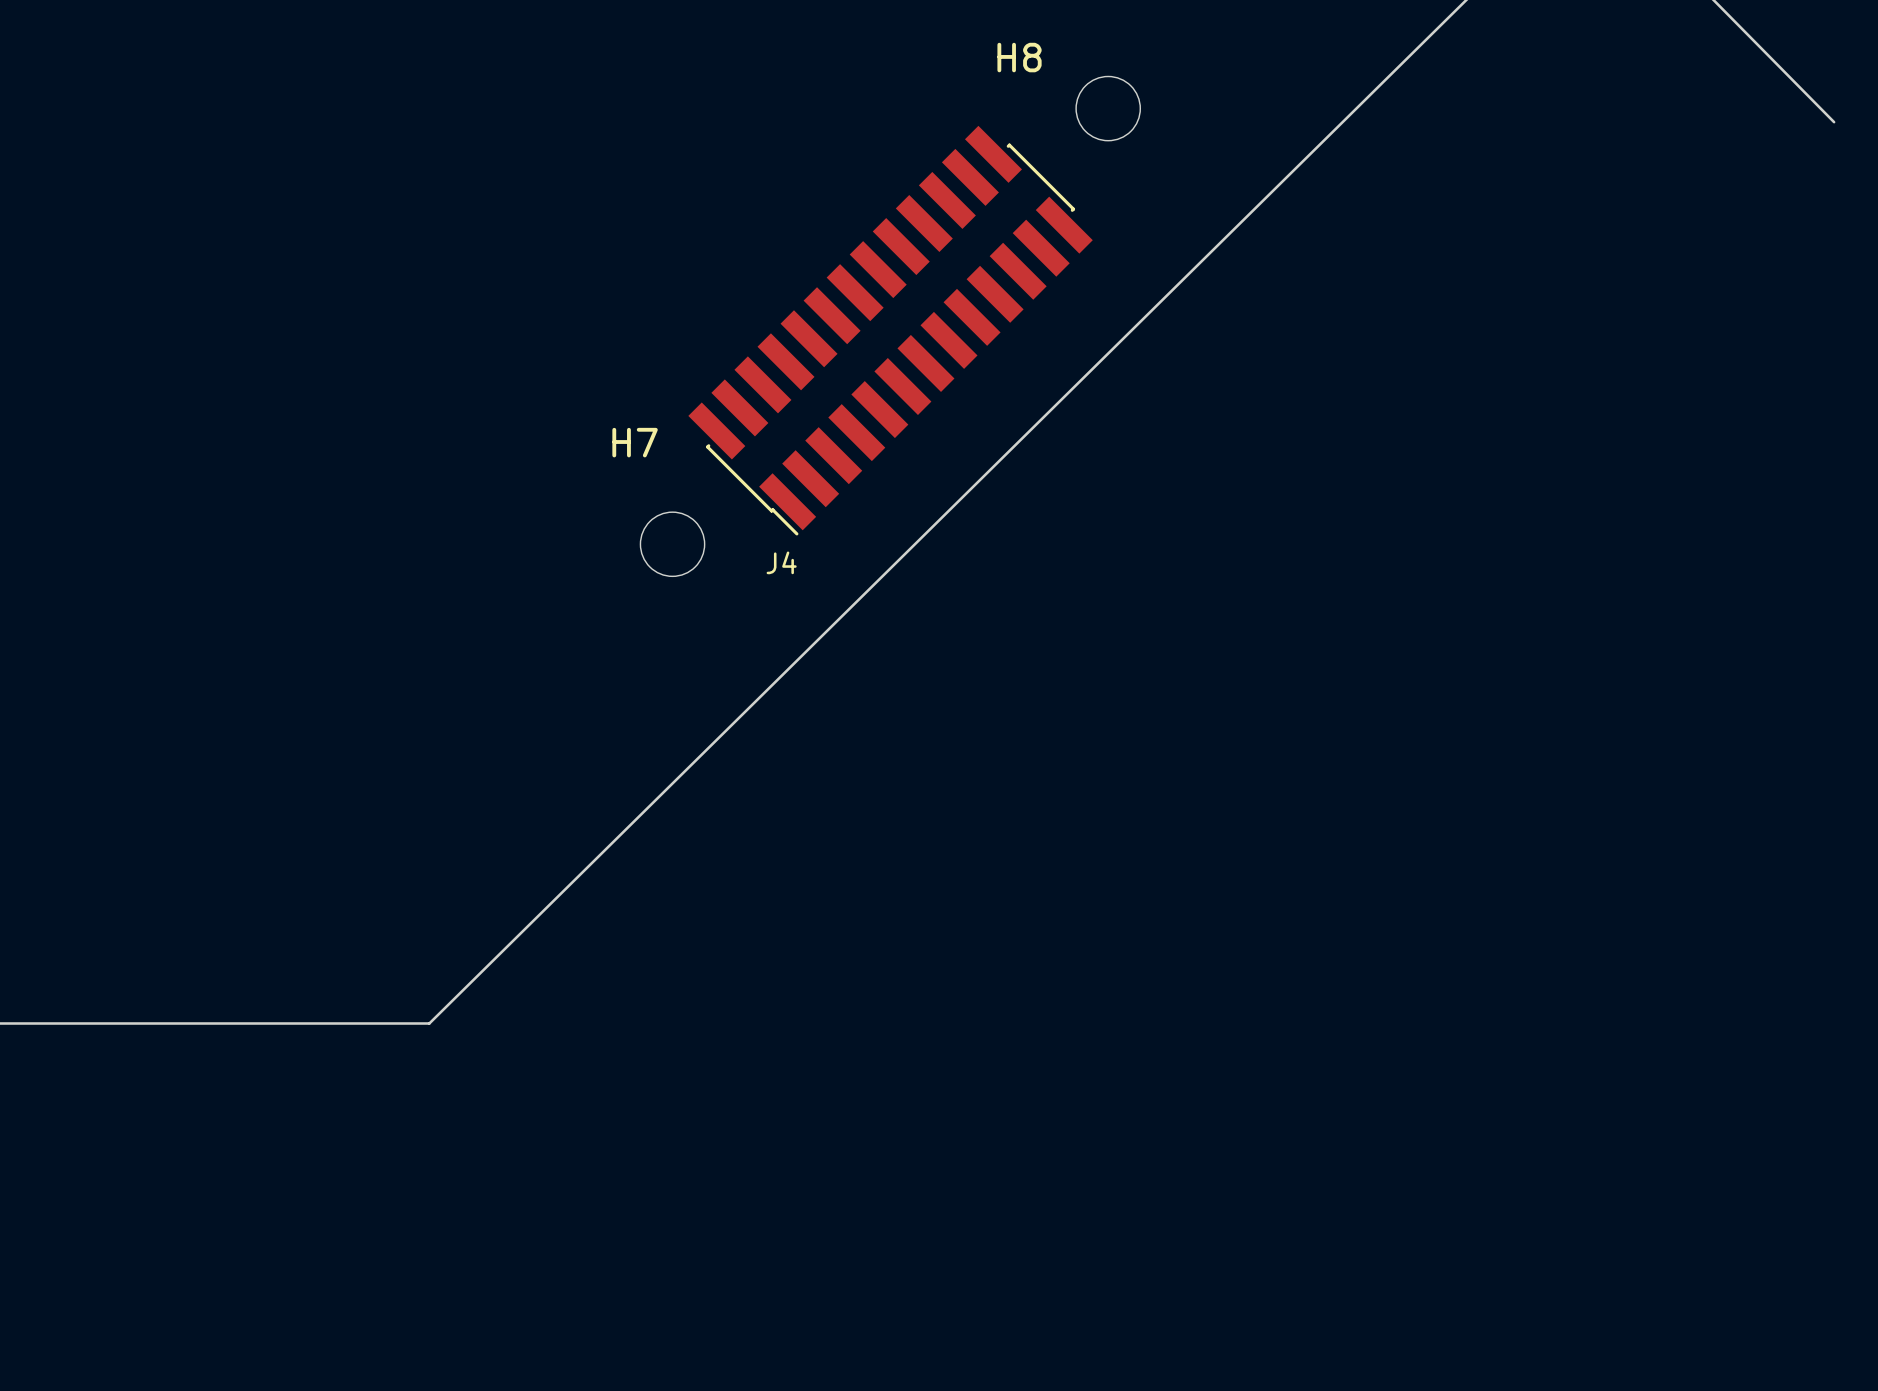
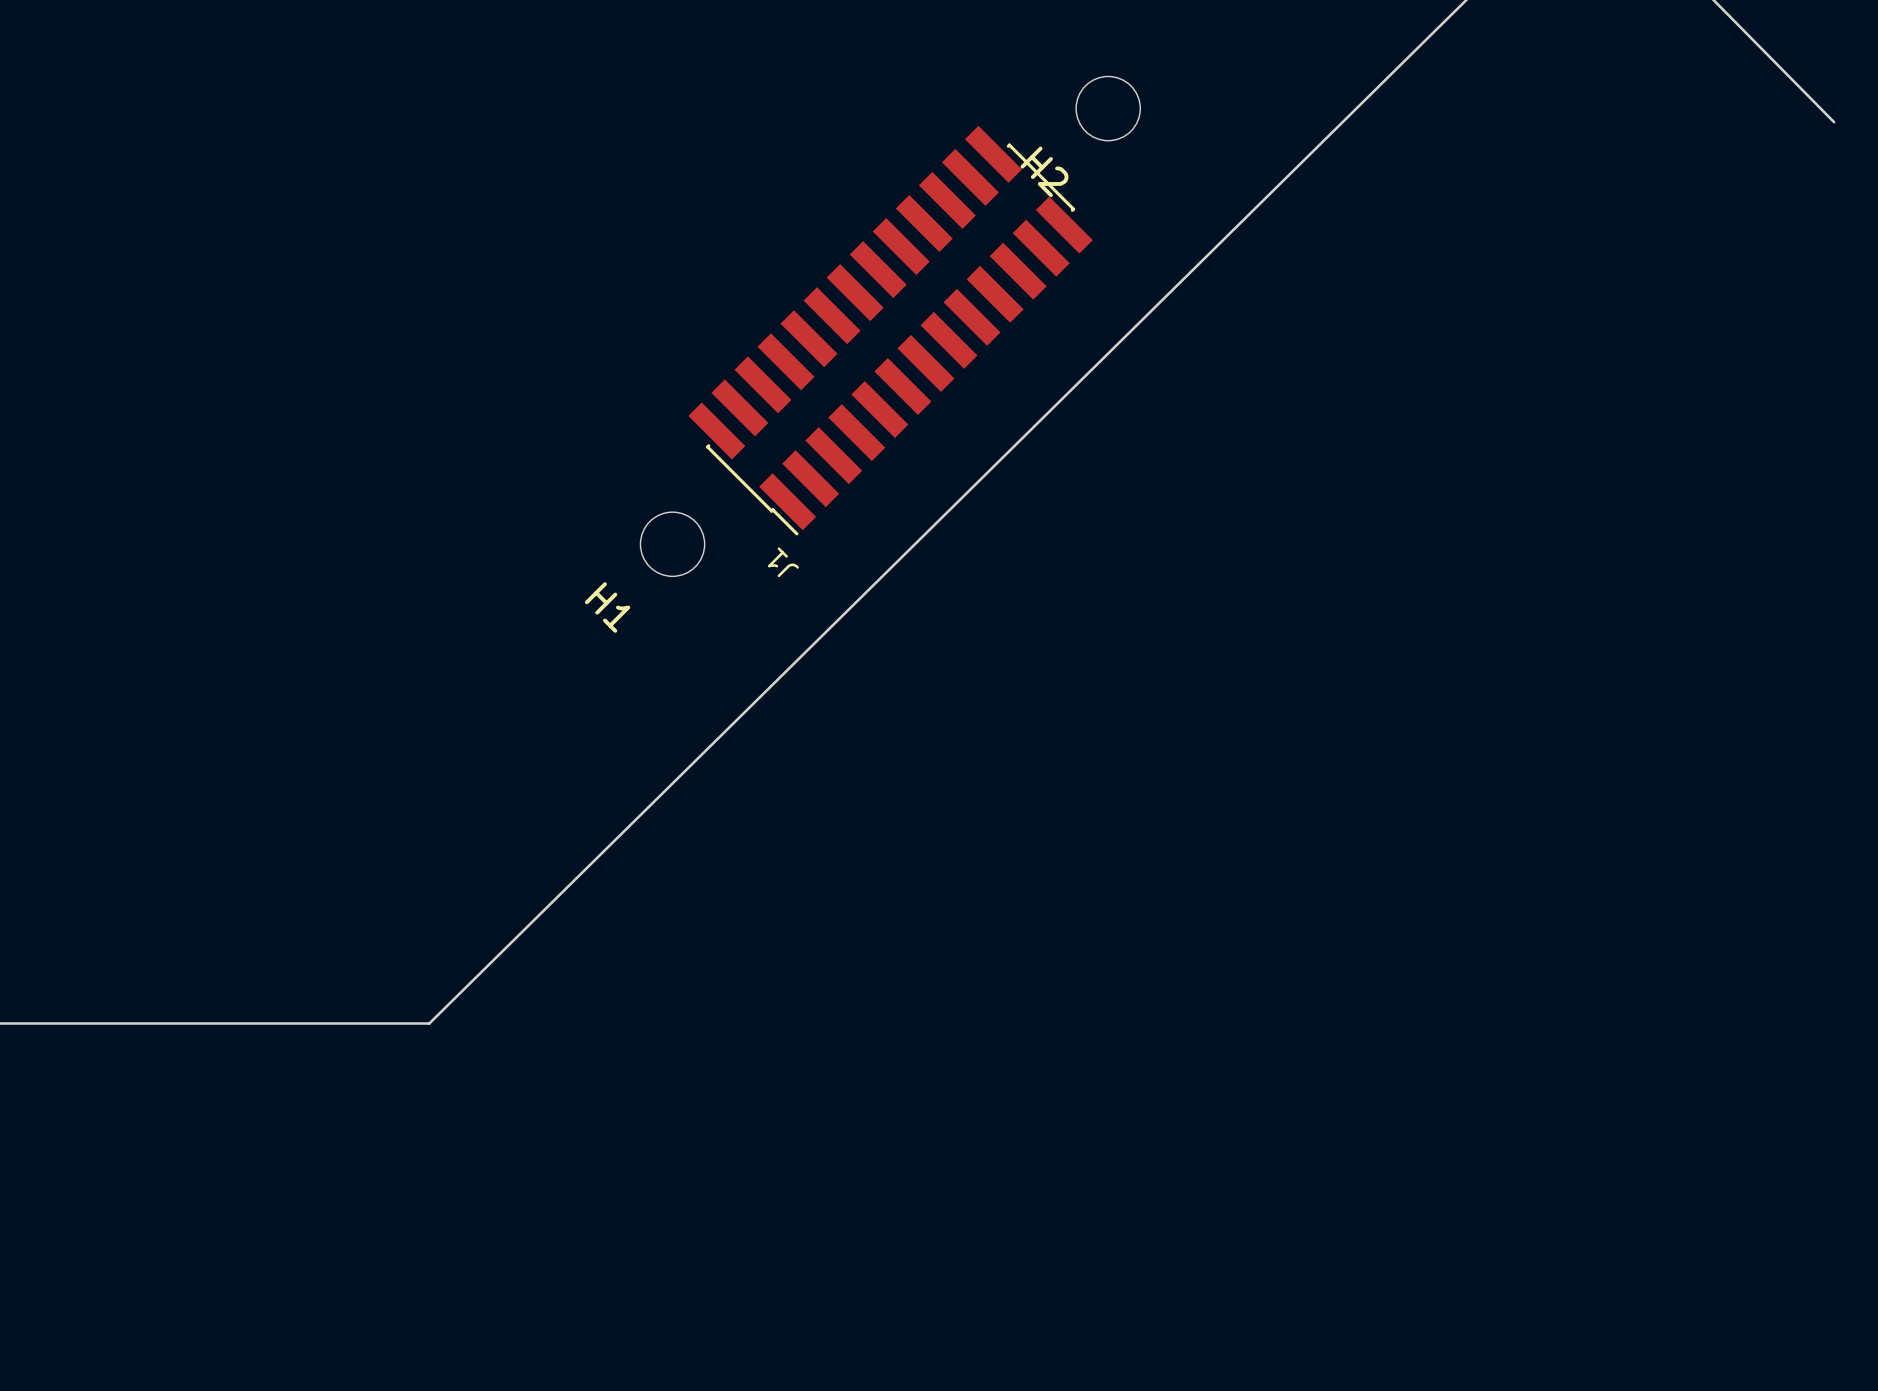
H8 name: H8 (1019, 57) -> H2 (1044, 171)
H7 name: H7 (635, 442) -> H1 (607, 607)
J4 name: J4 (781, 562) -> J1 (783, 562)

